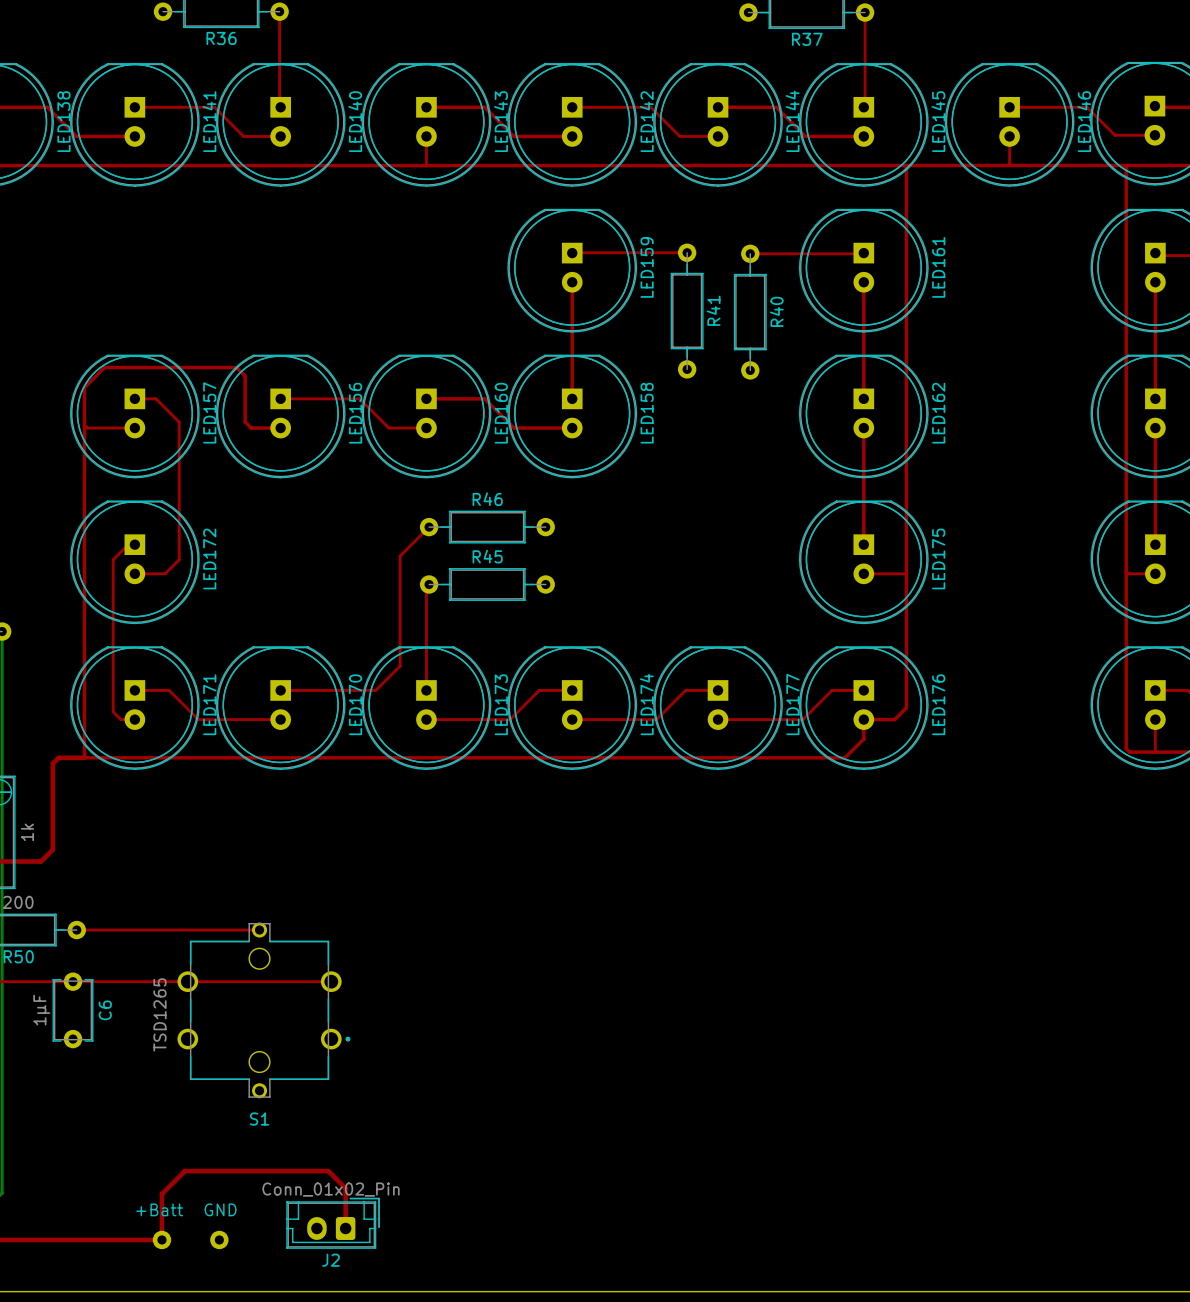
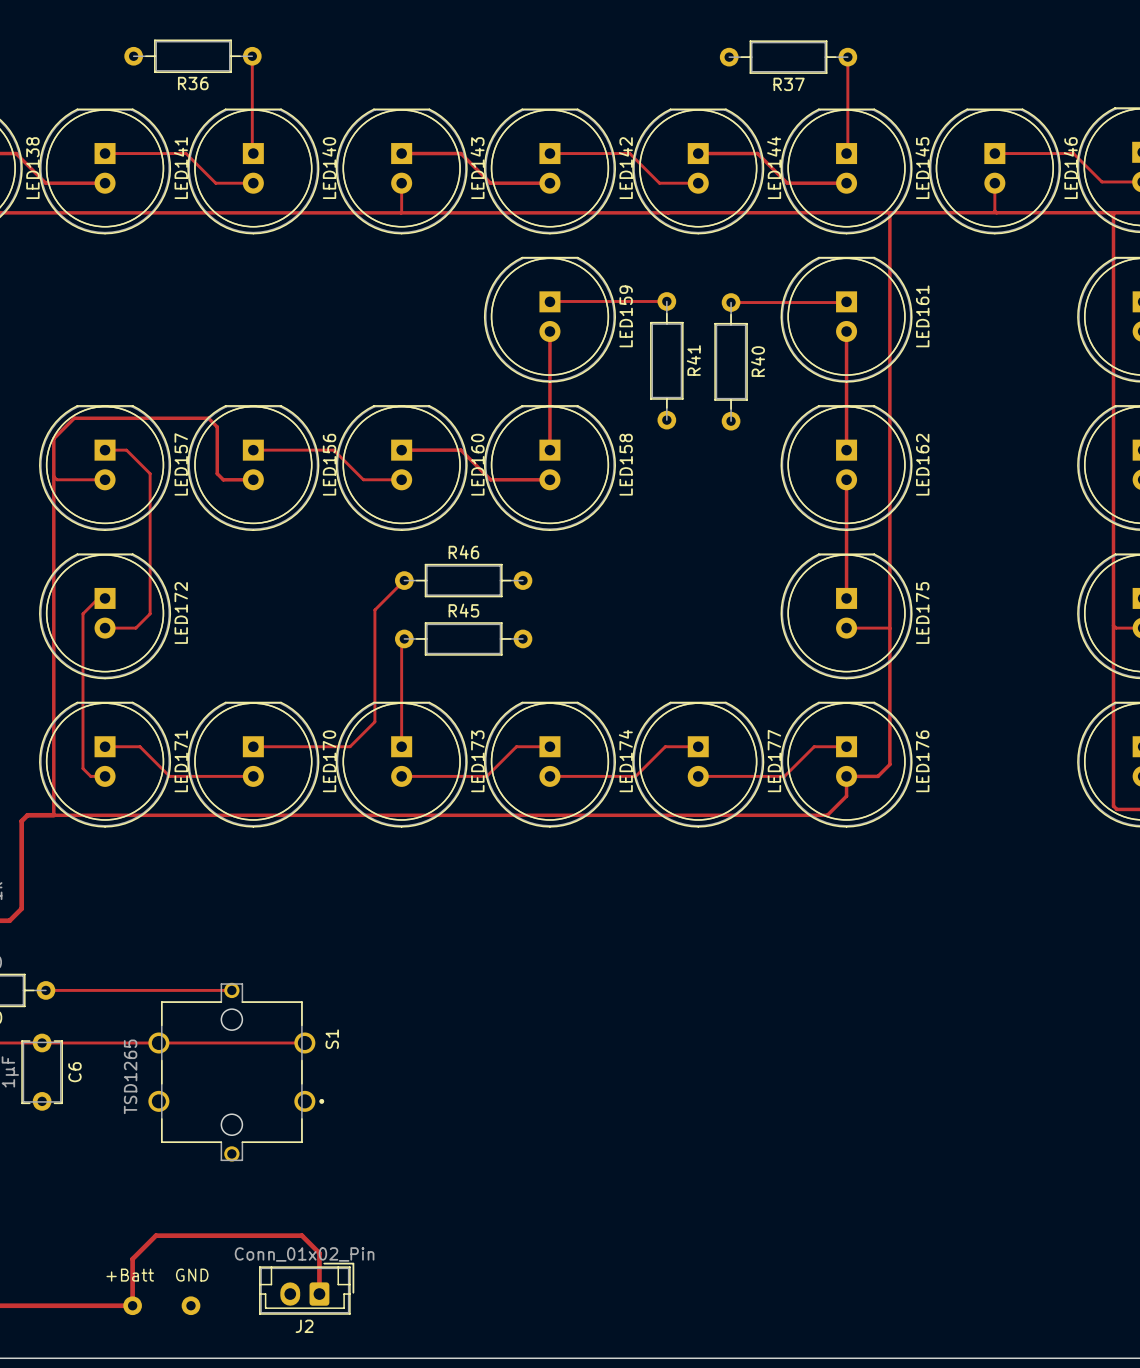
S1 name rotation: 0° (259, 1119) -> 90° counterclockwise (332, 1039)
S1 name position: S1 (259, 1119) -> S1 (332, 1039)

